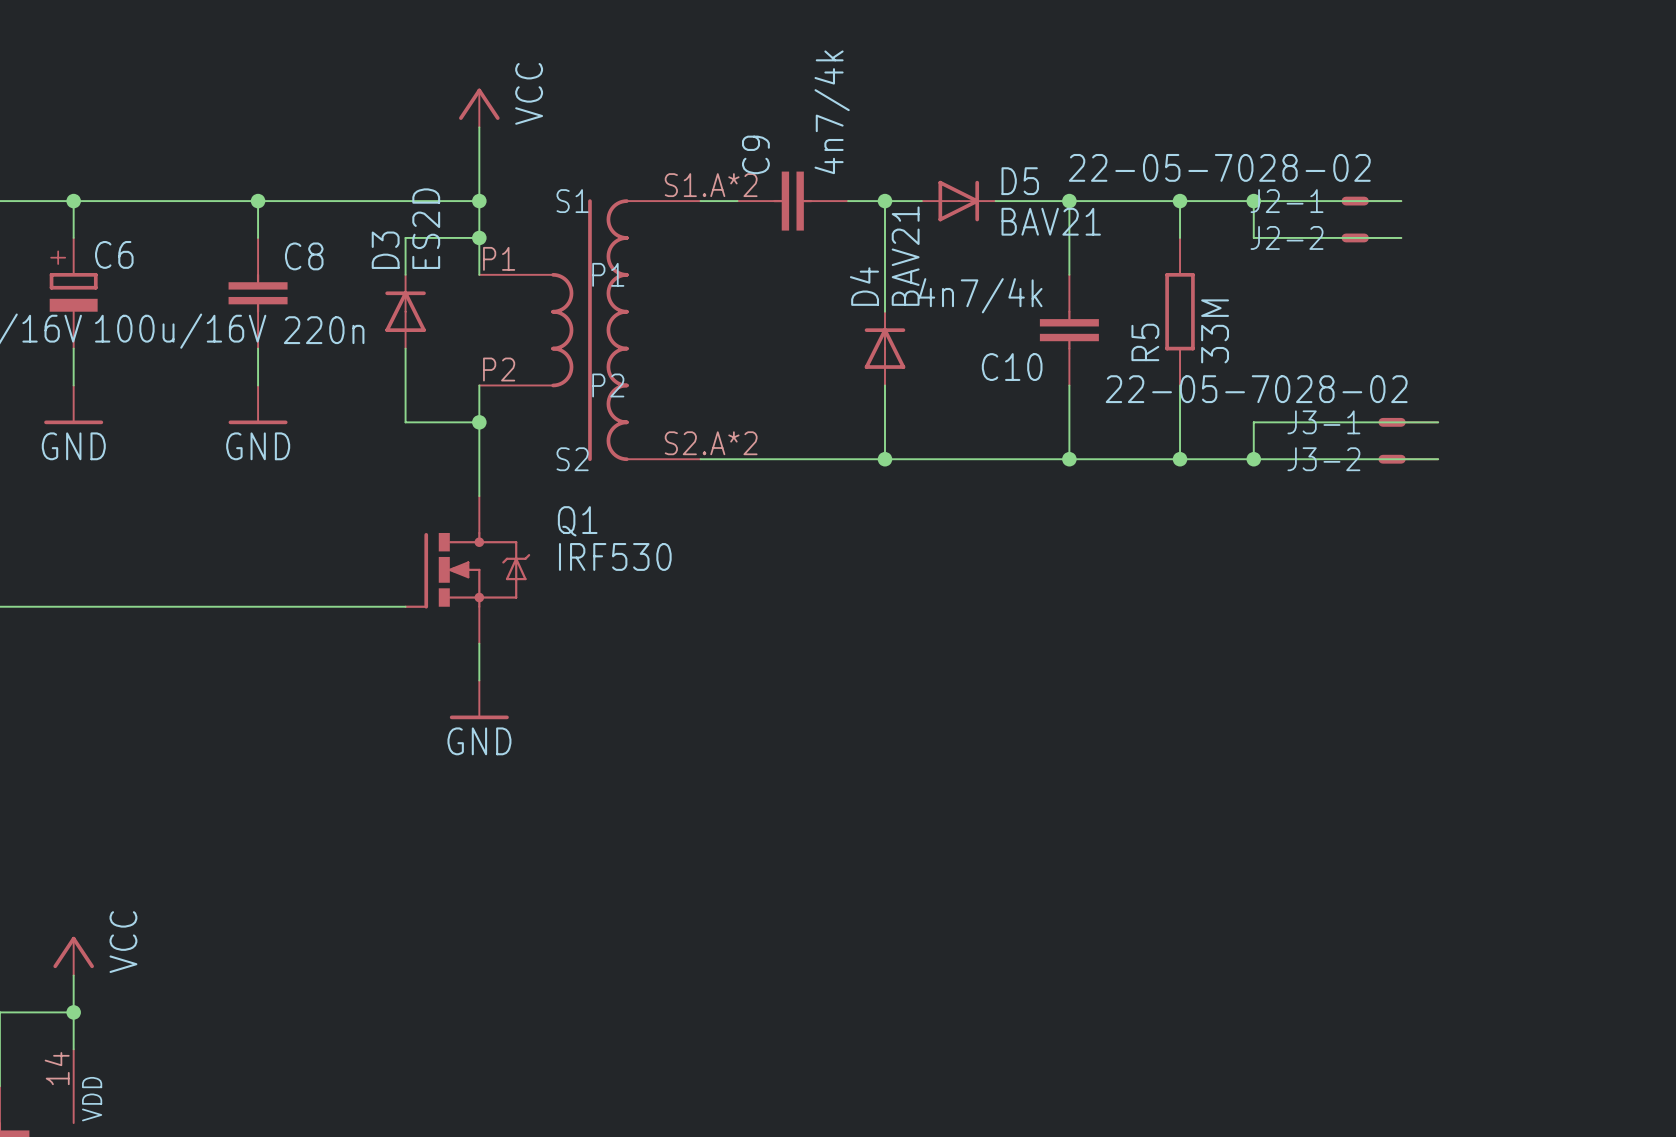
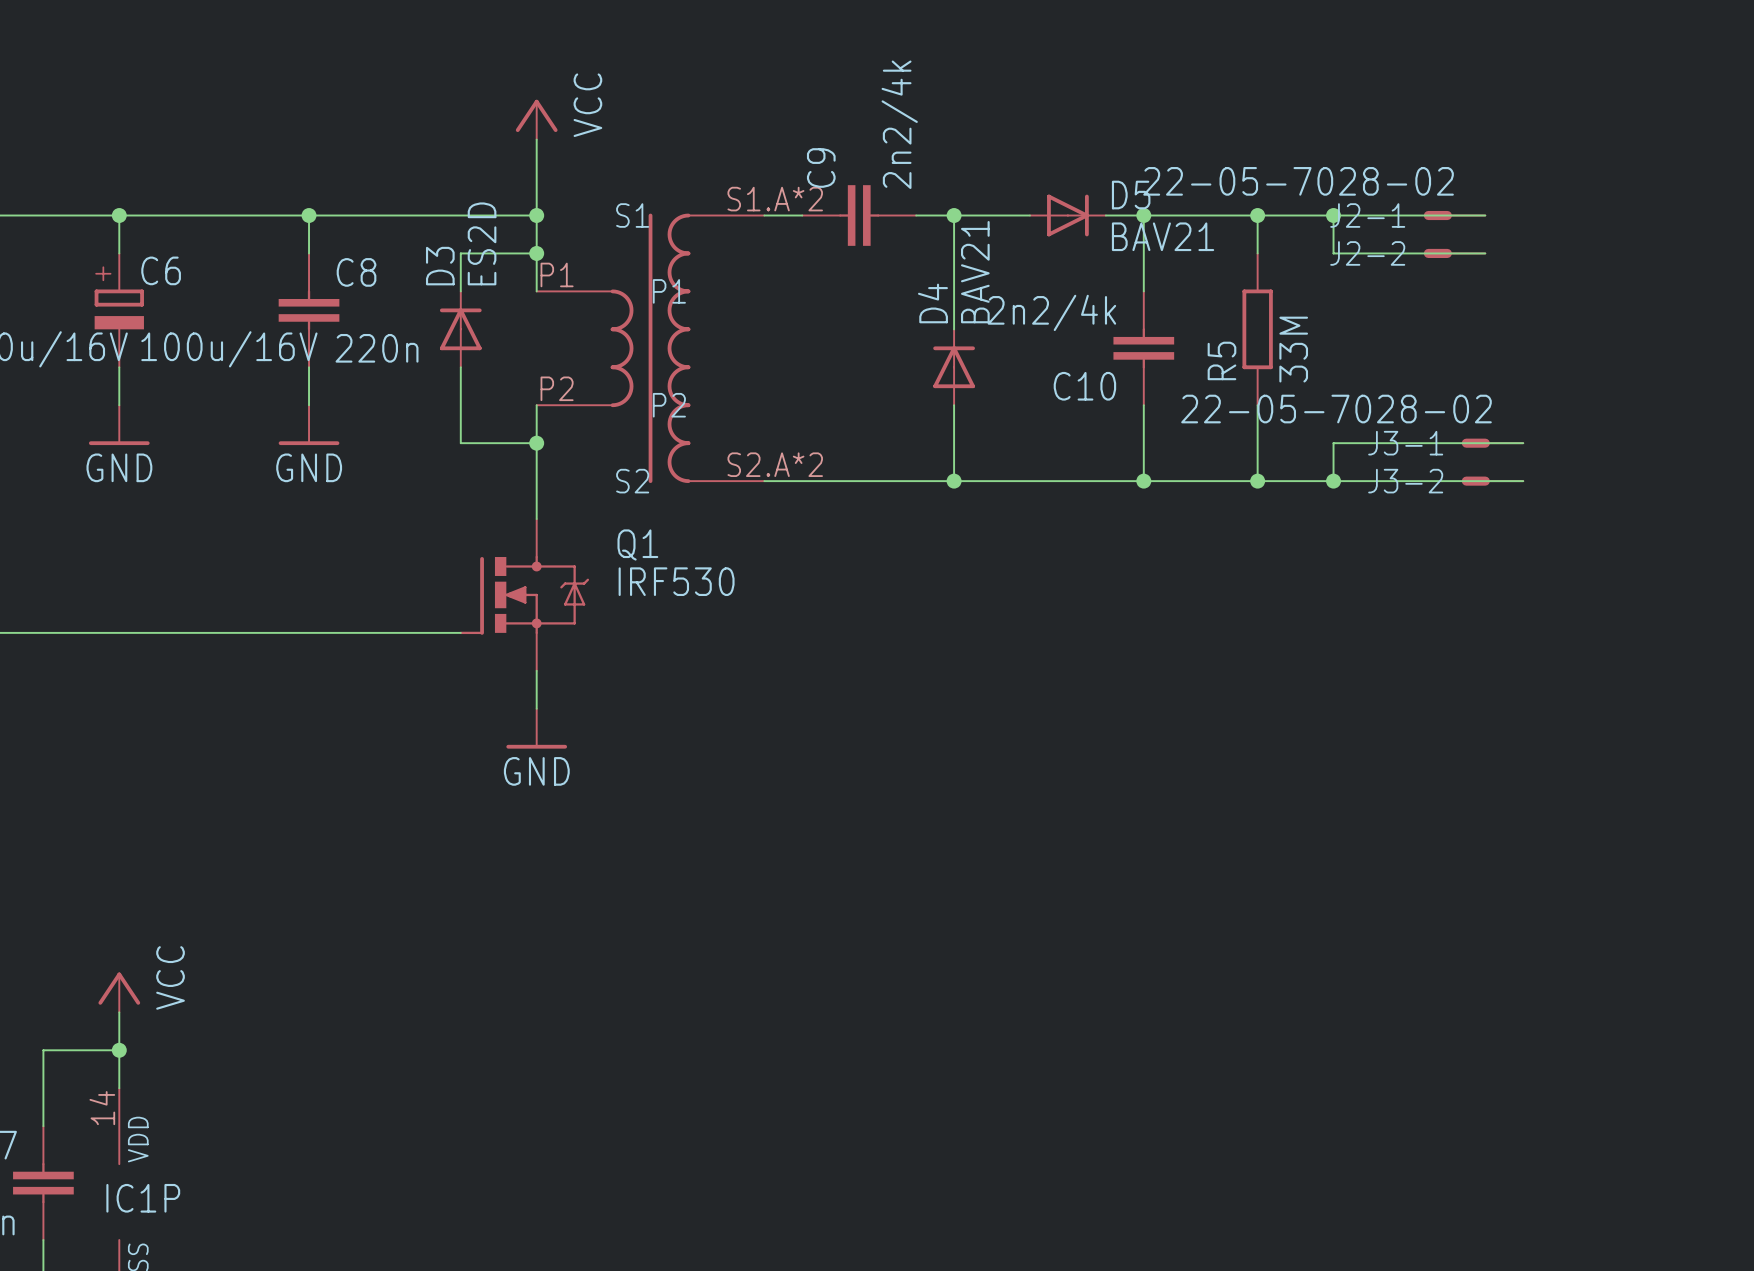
C9 value: 4n7/4k (832, 112) -> 2n2/4k (899, 124)
D5 position: (958, 201) -> (1067, 215)
C10 value: 4n7/4k (980, 295) -> 2n2/4k (1051, 312)

